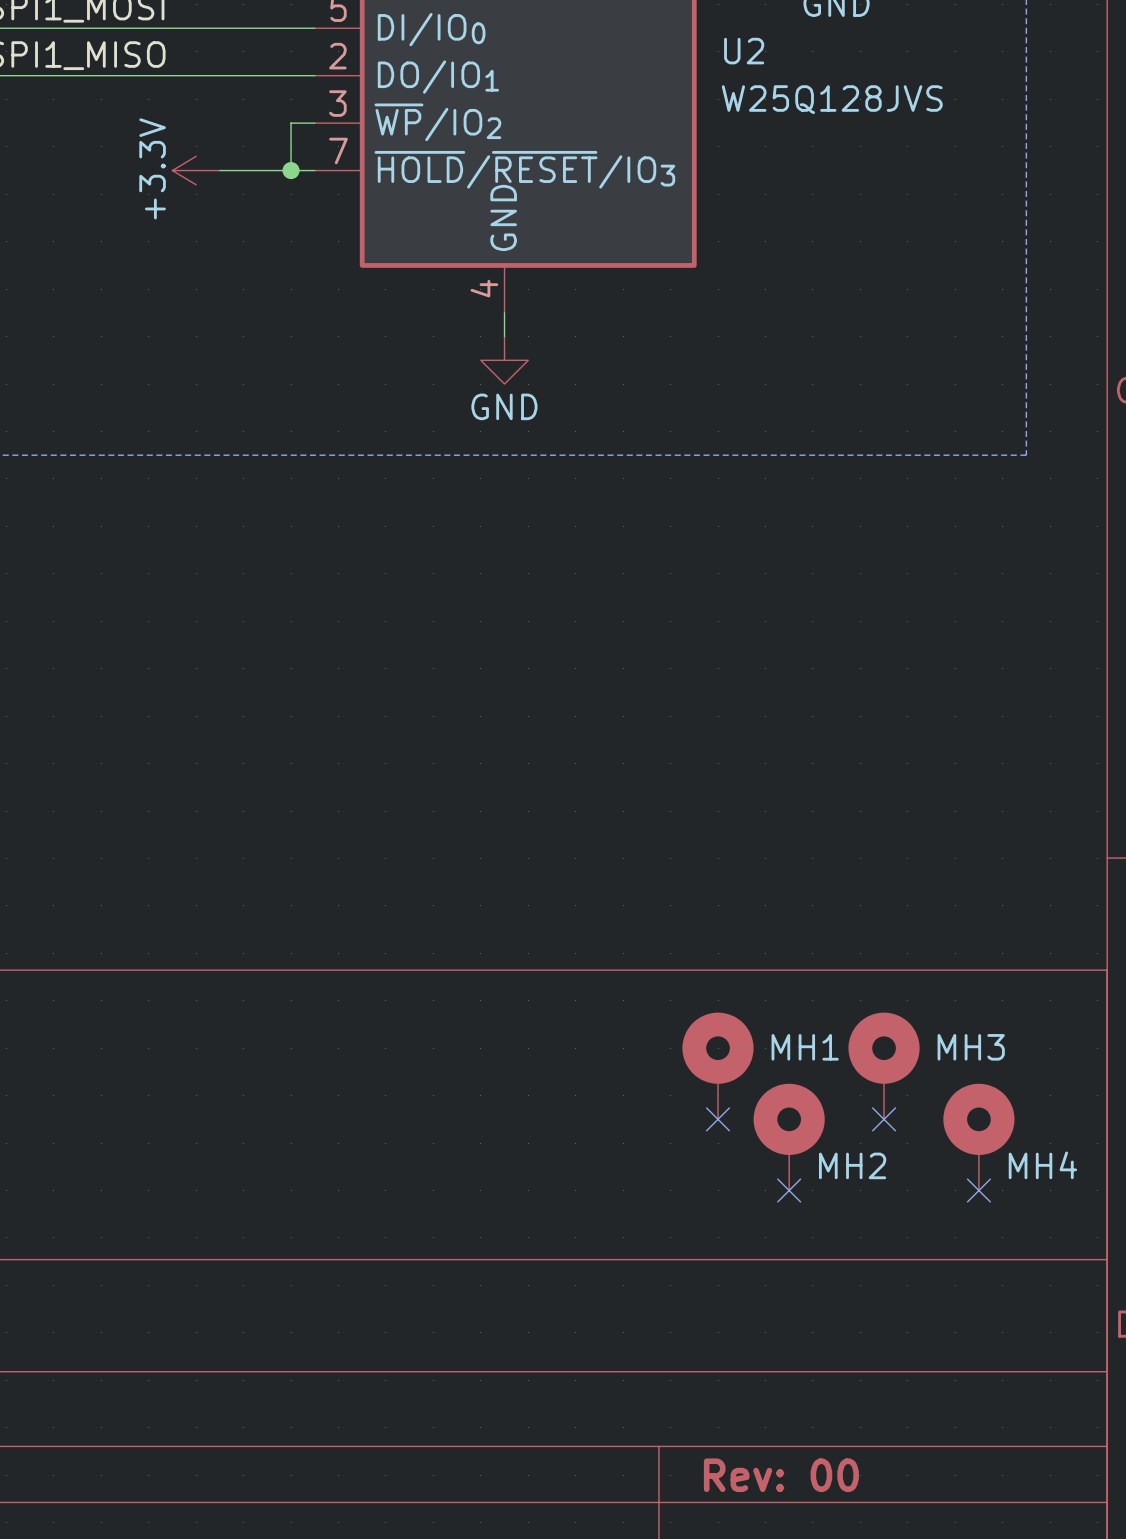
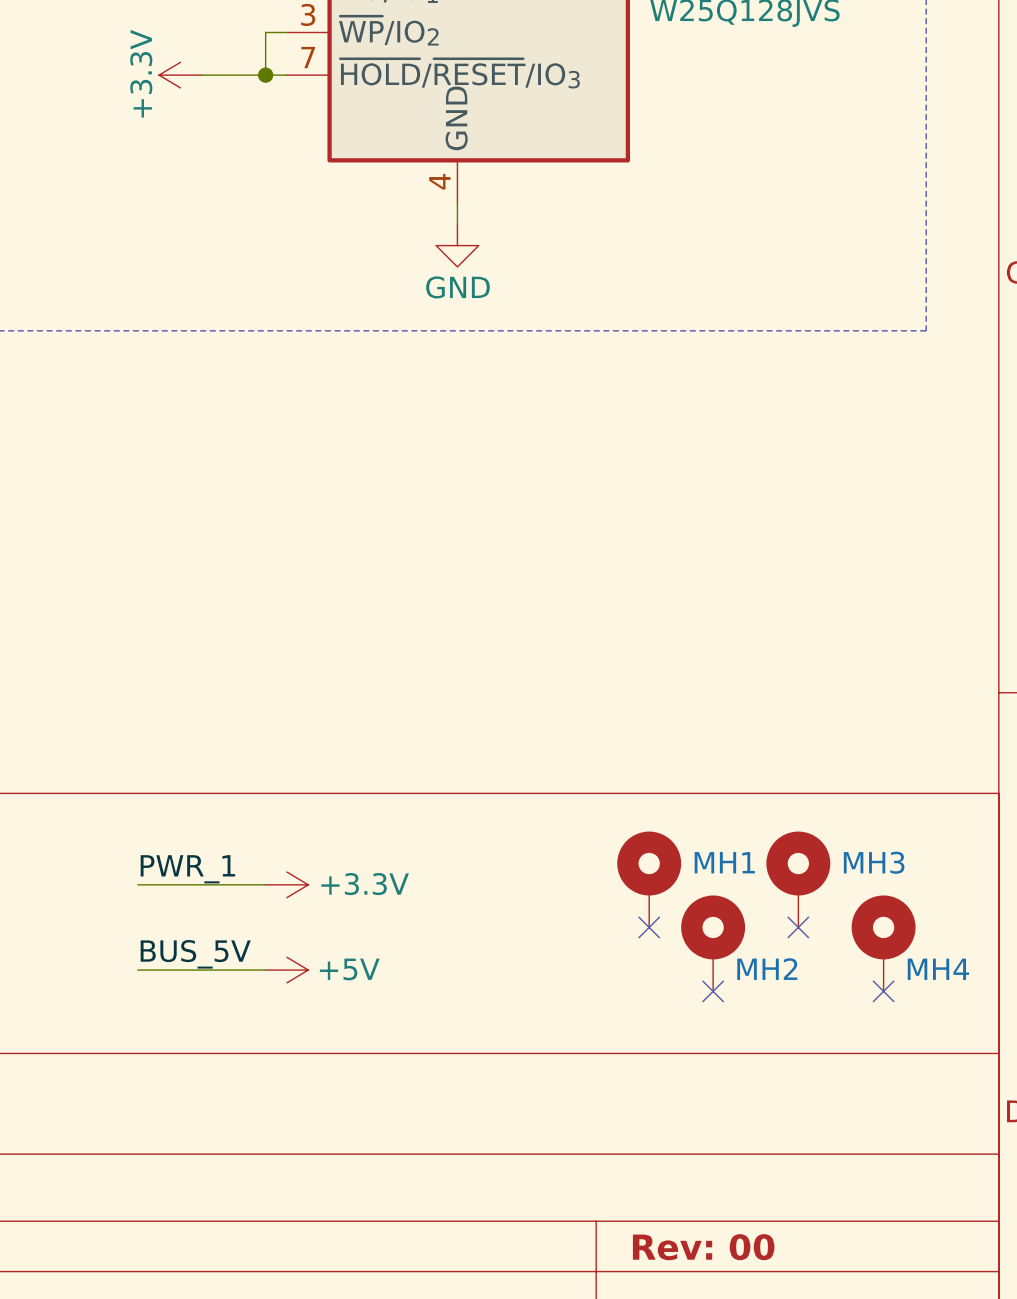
label: none -> PWR_1 (187, 869)
wire: none -> (137, 884) (265, 884)
power symbol: none -> +3.3V (286, 884)
label: none -> BUS_5V (195, 954)
wire: none -> (137, 970) (265, 970)
power symbol: none -> +5V (286, 970)

